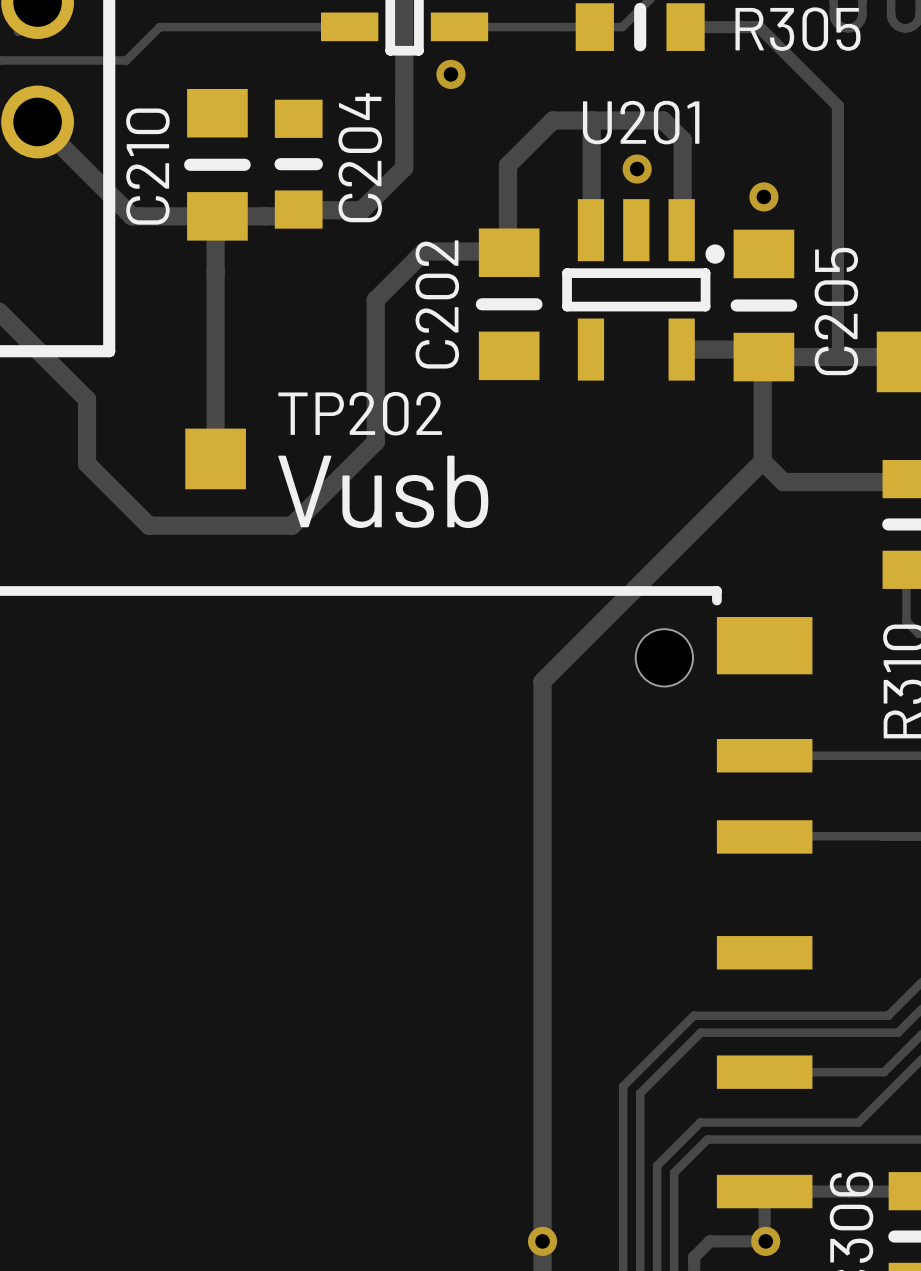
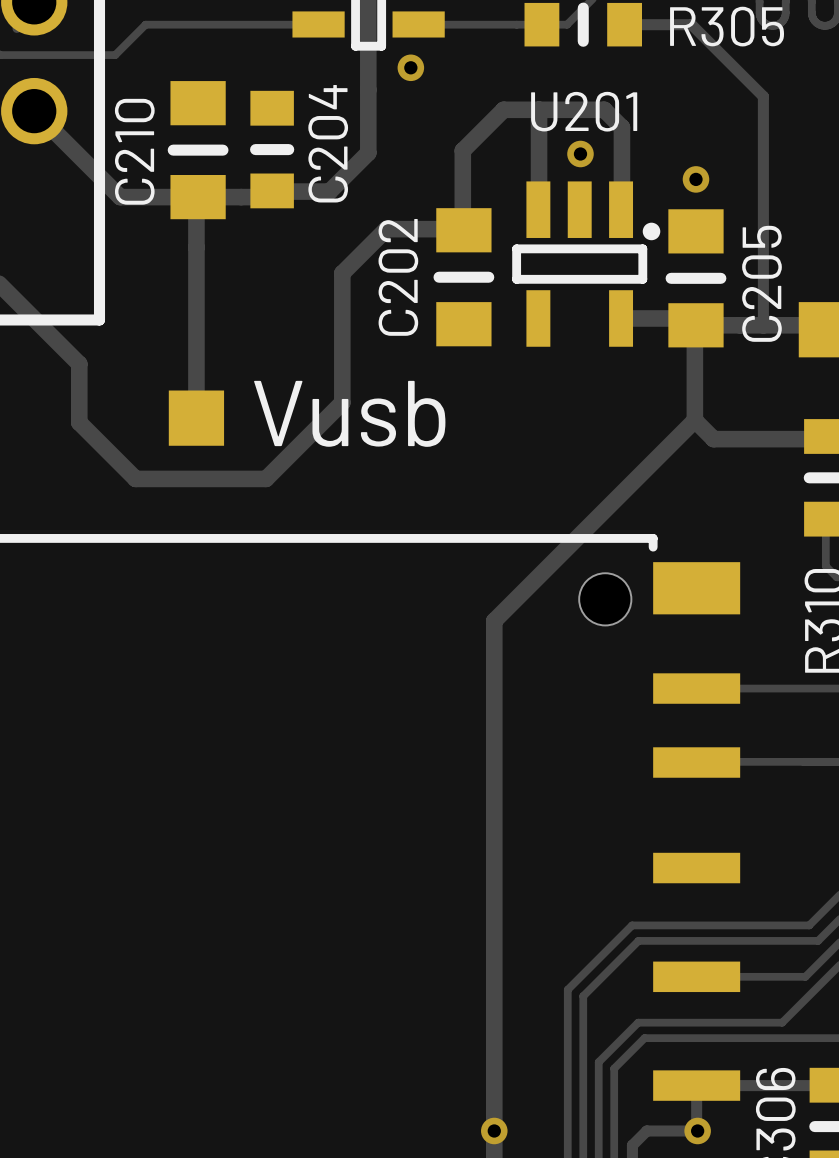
TP202 name: TP202 (360, 413) -> none
text position: Vusb (383, 491) -> Vusb (349, 413)

